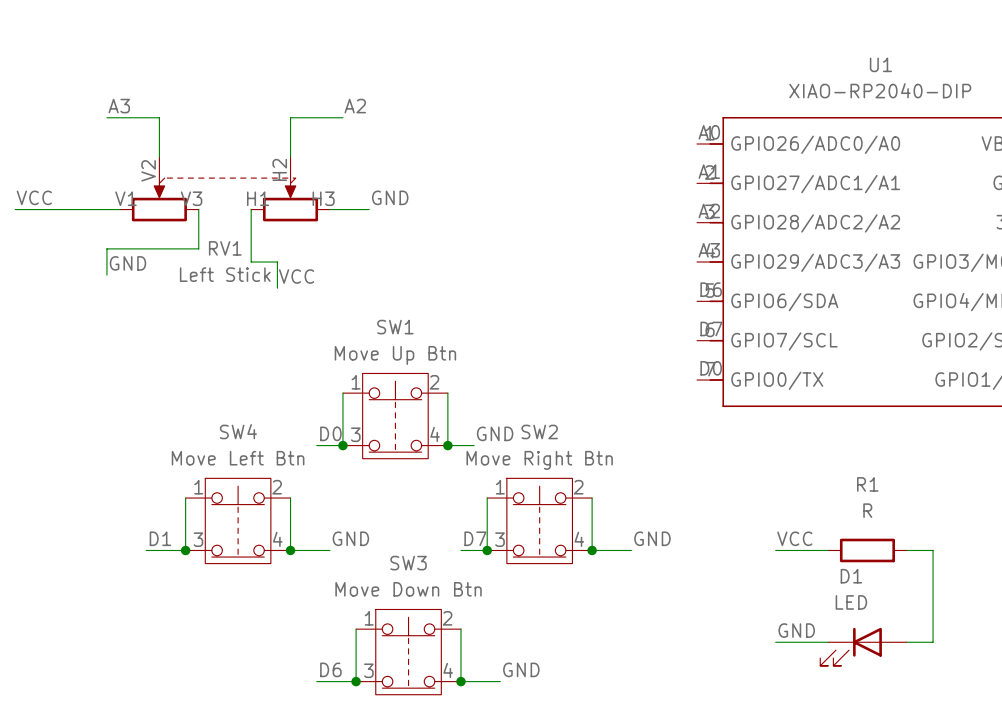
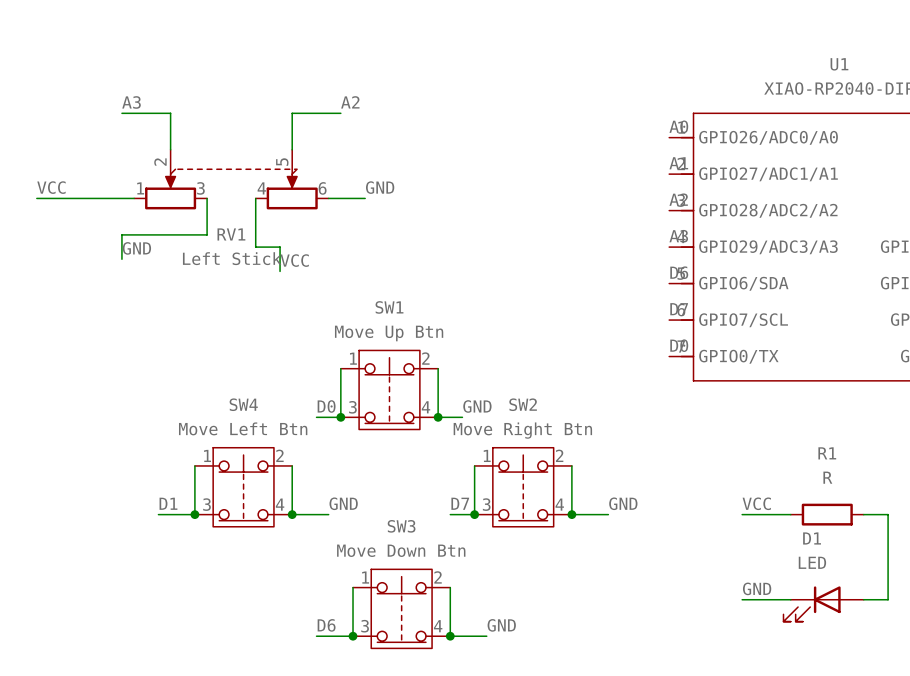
RV1 pin number: H2 (279, 169) -> 5 (282, 162)
RV1 pin number: V2 (148, 170) -> 2 (160, 162)
RV1 pin number: V1 (126, 198) -> 1 (140, 188)
RV1 pin number: V3 (191, 198) -> 3 (200, 188)
RV1 pin number: H1 (258, 198) -> 4 (261, 188)
RV1 pin number: H3 (323, 198) -> 6 (322, 188)

